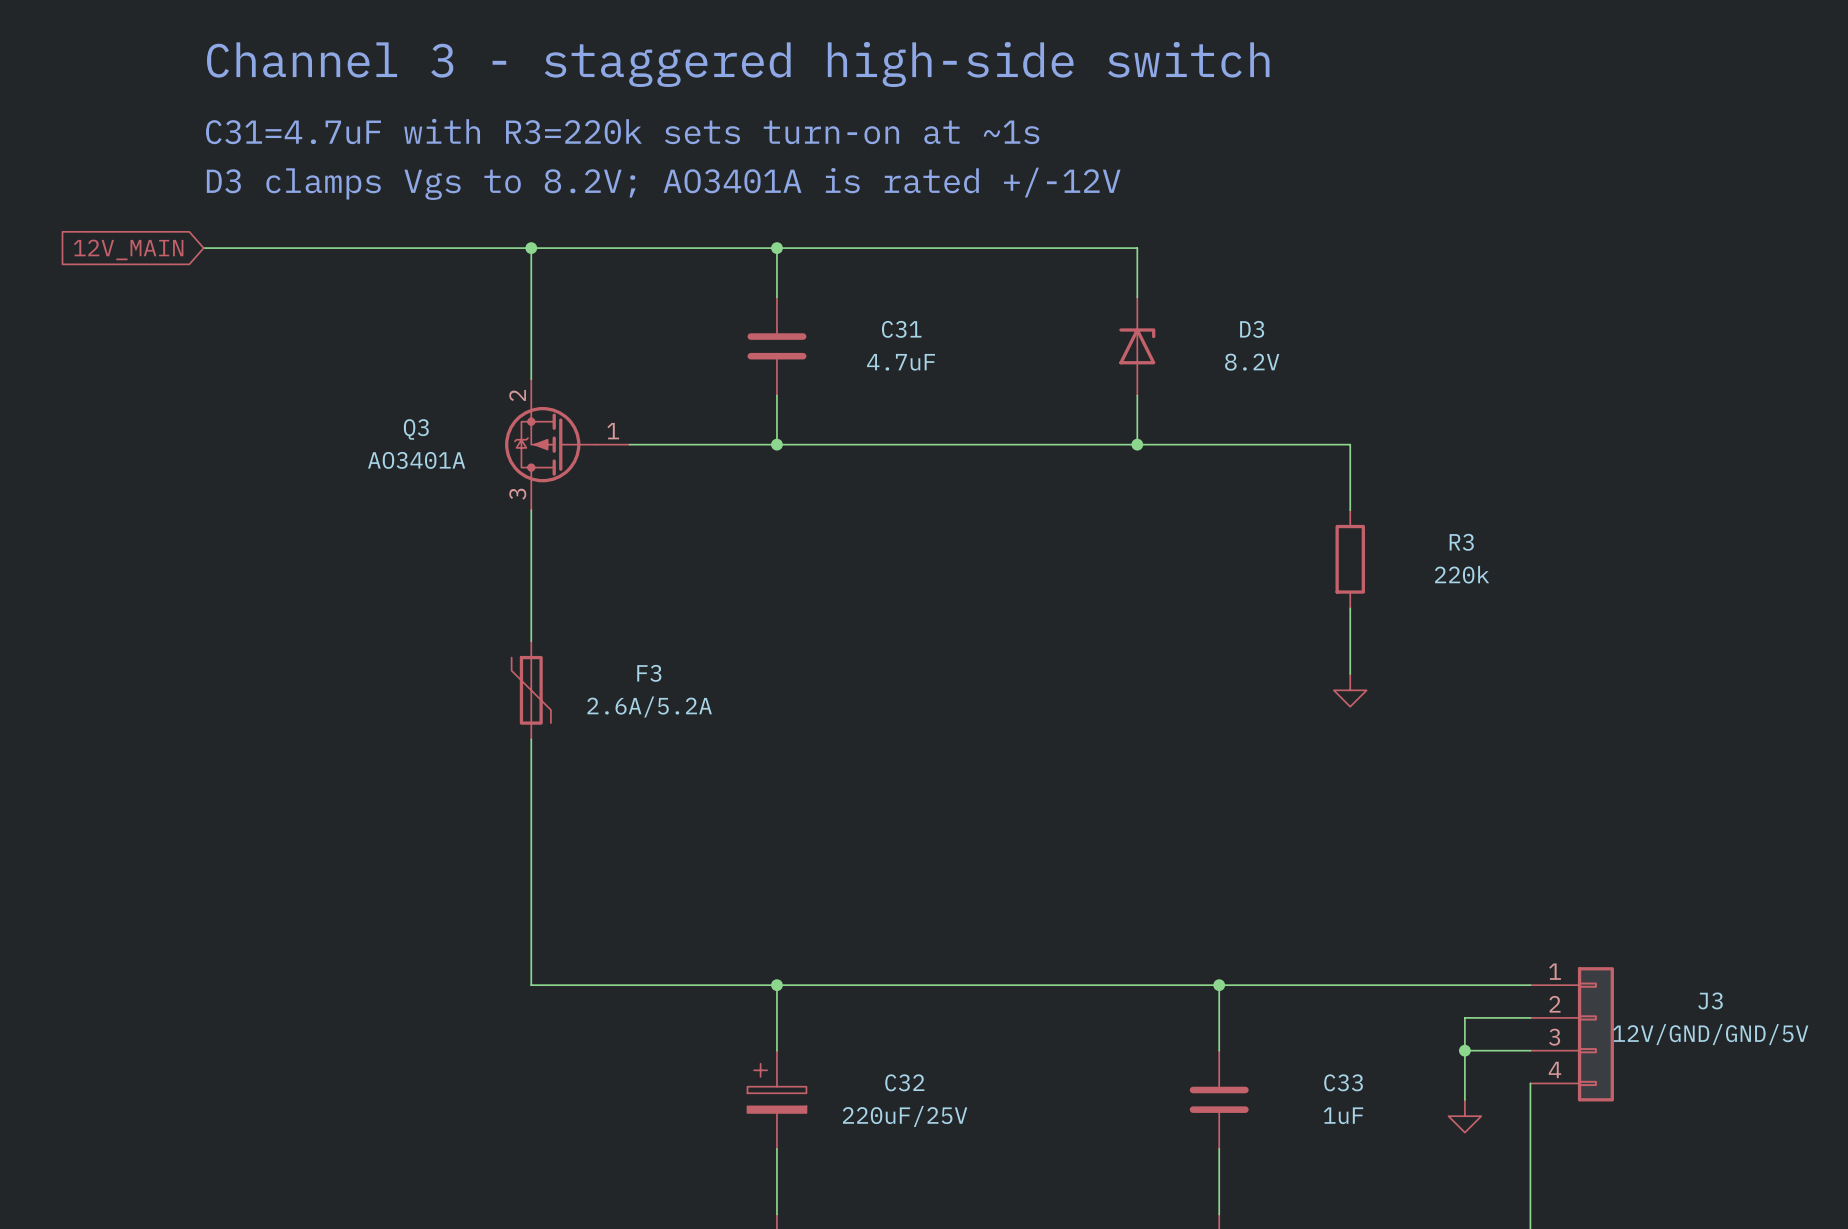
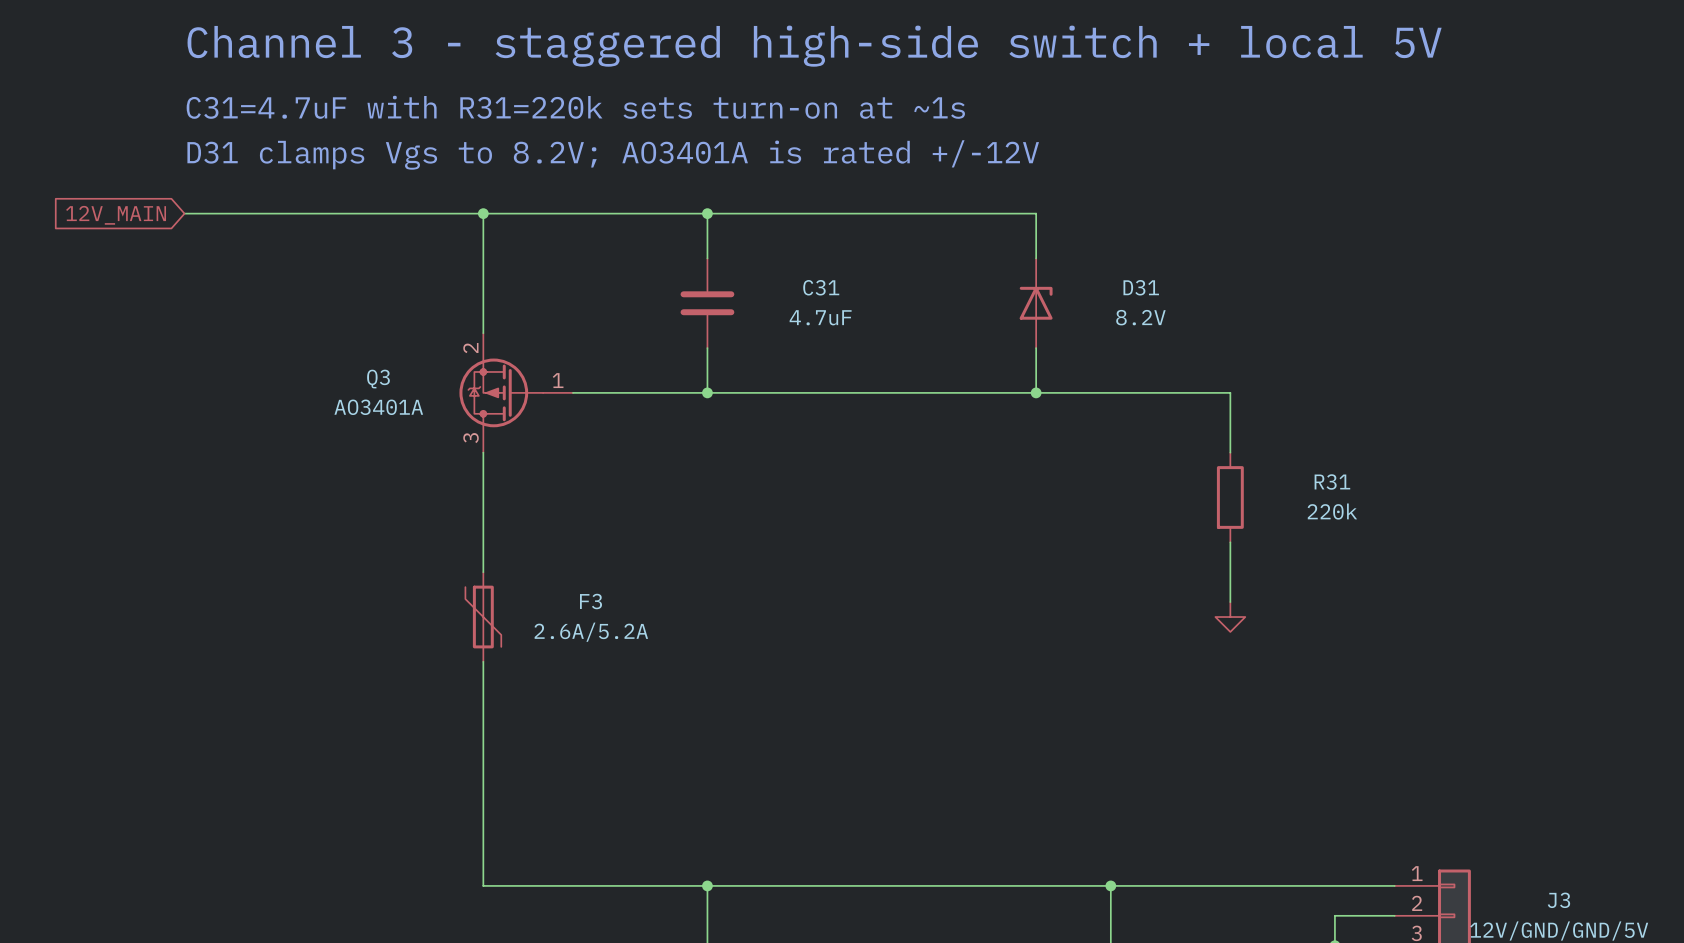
text: Channel 3 - staggered high-side switch (738, 64) -> Channel 3 - staggered high-side switch + local 5V (814, 46)
text: C31=4.7uF with R3=220k sets turn-on at ~1s (622, 131) -> C31=4.7uF with R31=220k sets turn-on at ~1s (575, 107)
text: D3 clamps Vgs to 8.2V; AO3401A is rated +/-12V (663, 183) -> D31 clamps Vgs to 8.2V; AO3401A is rated +/-12V (613, 154)
D3 name: D3 (1252, 329) -> D31 (1141, 287)
R3 name: R3 (1461, 542) -> R31 (1332, 481)

